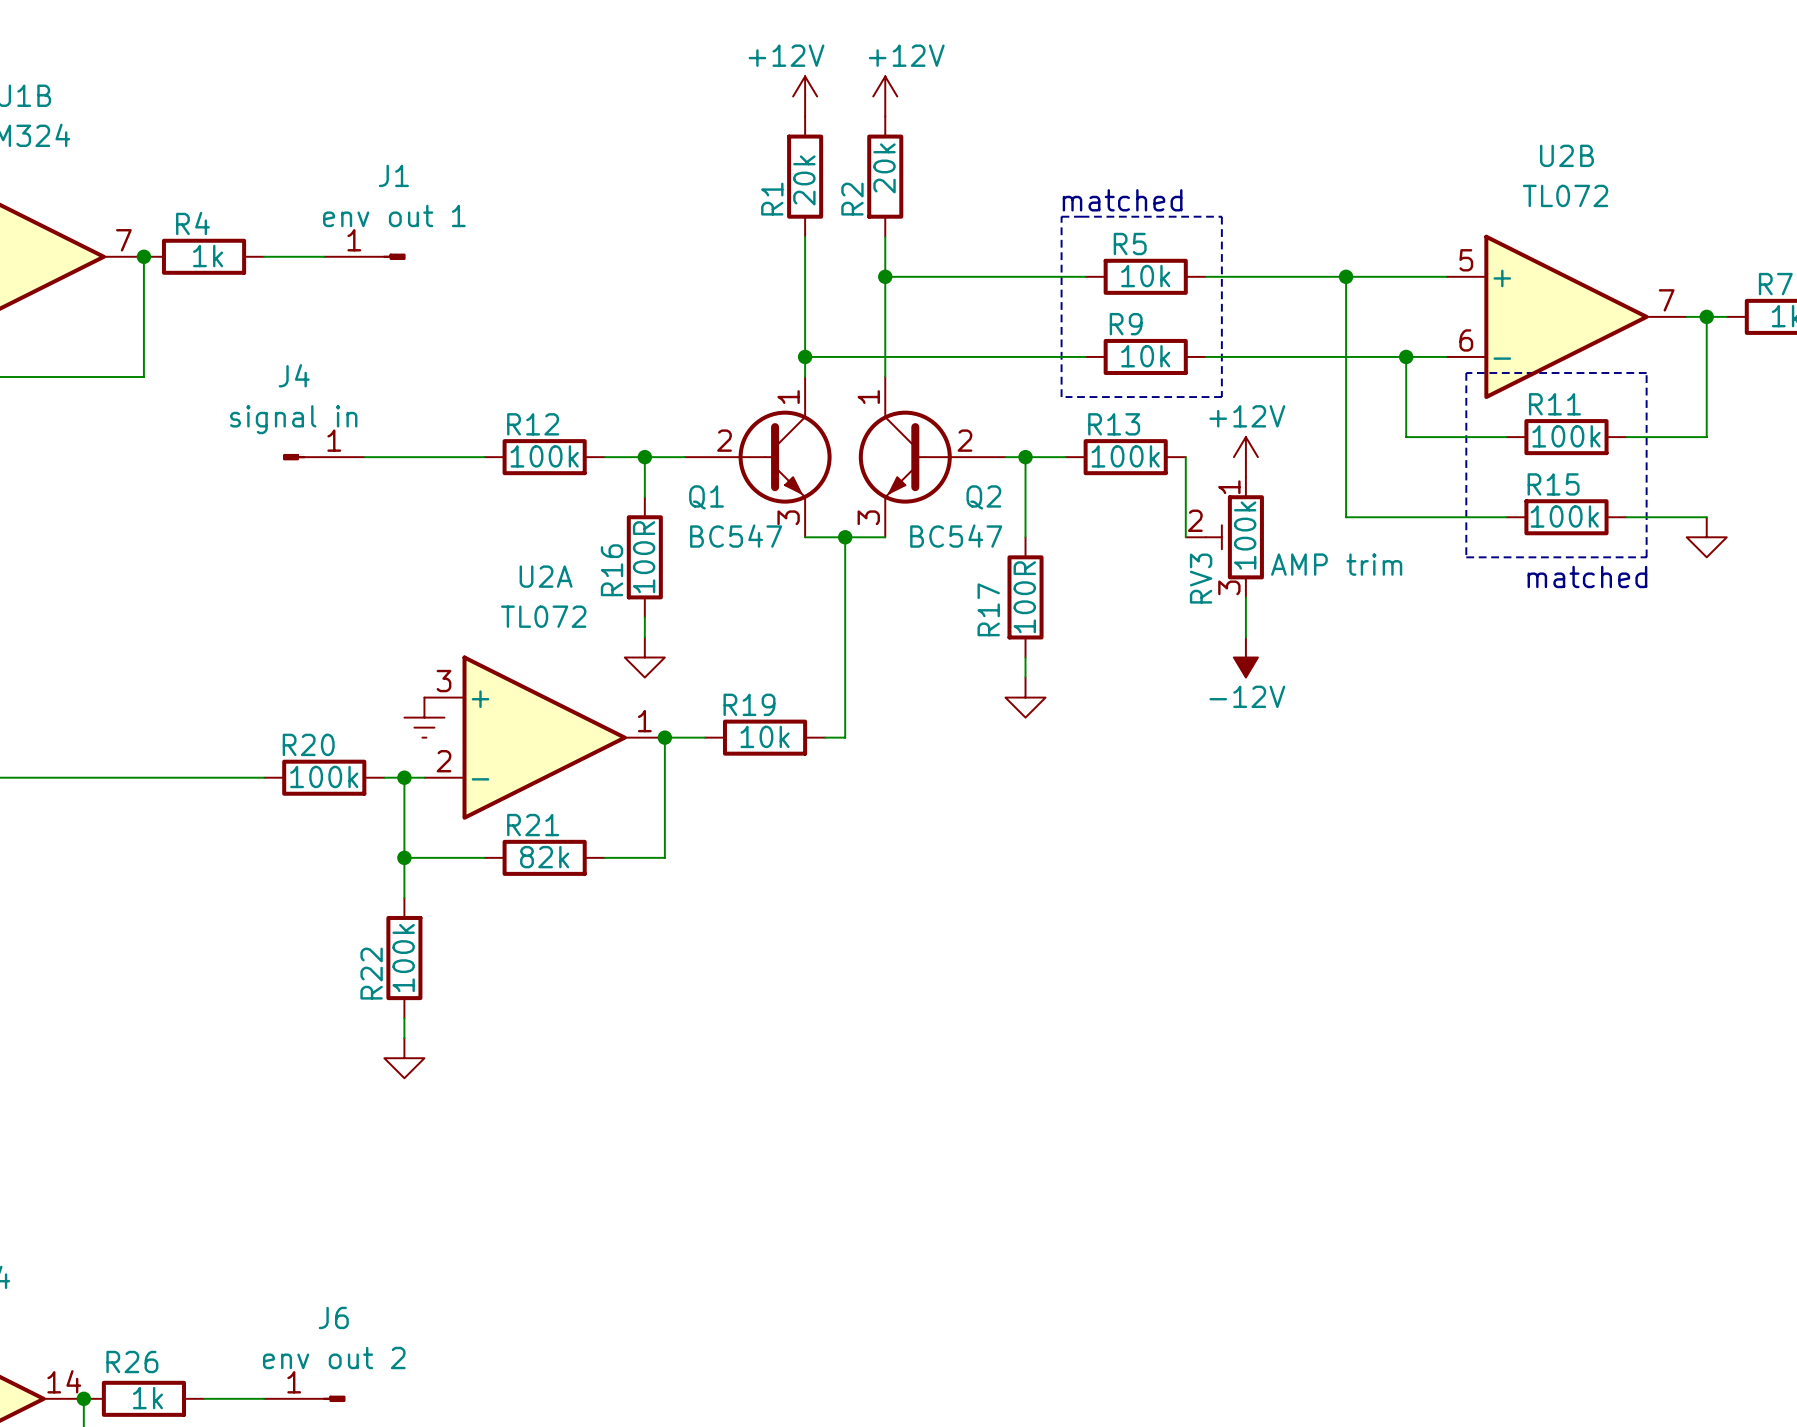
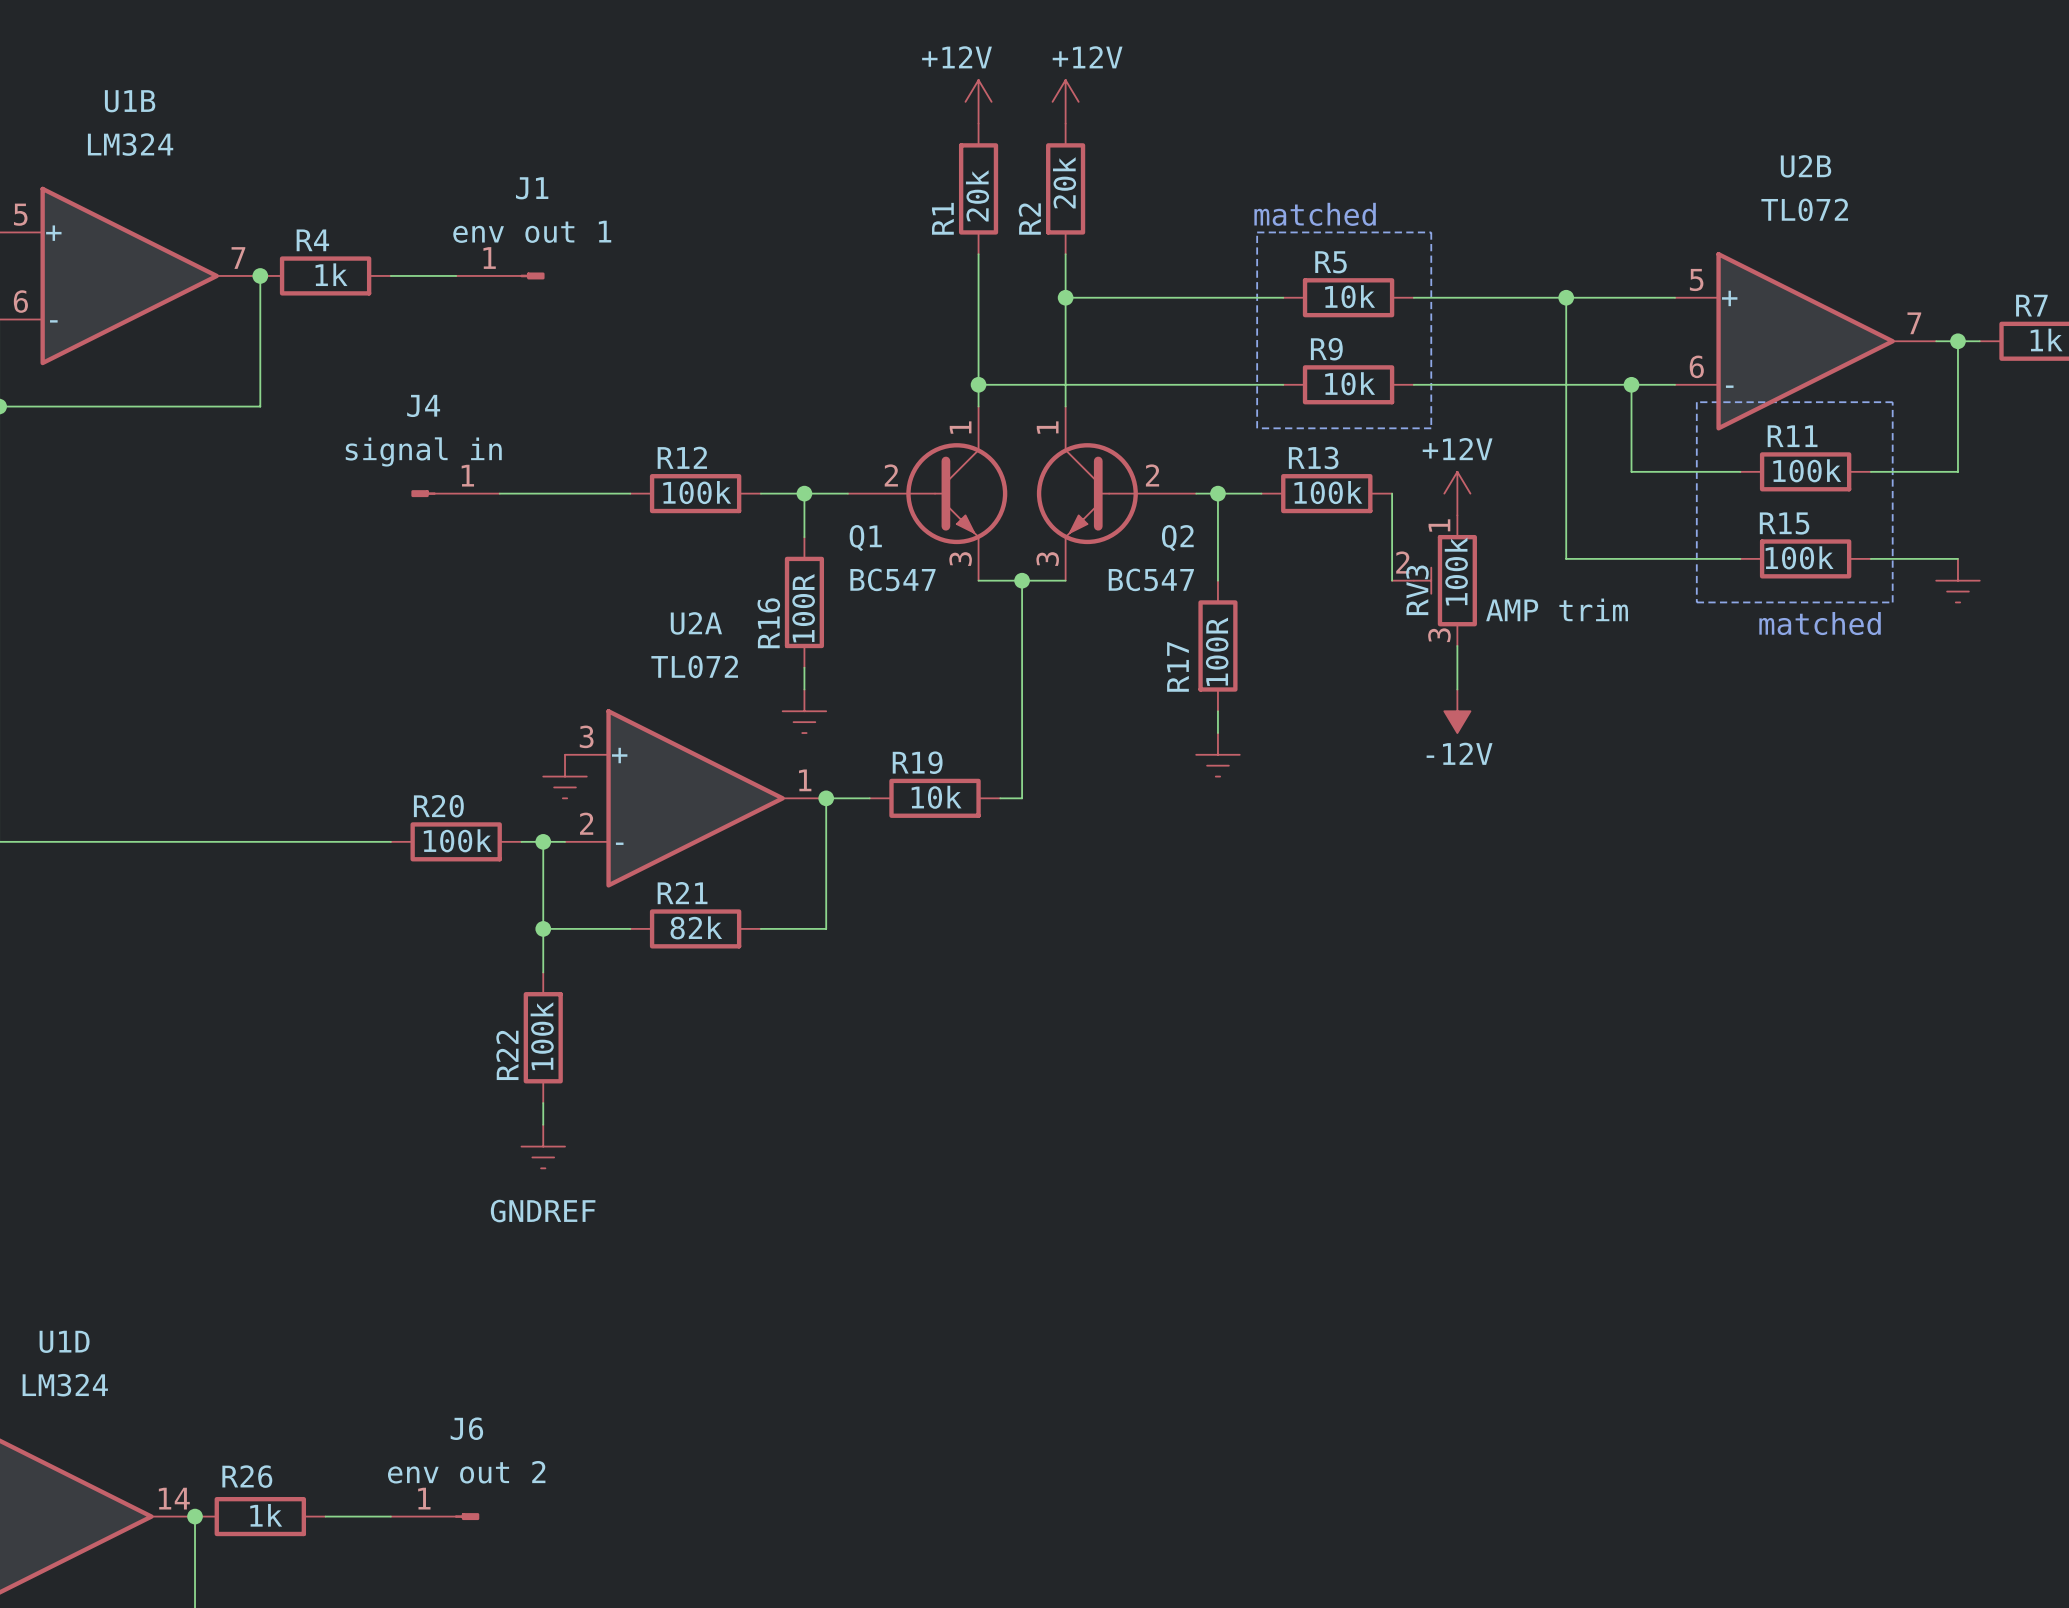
power symbol shape: [1686, 517, 1727, 558] -> [1936, 558, 1980, 603]
RV3 name position: RV3 (1201, 578) -> RV3 (1417, 590)
power symbol shape: [624, 637, 665, 678] -> [782, 689, 827, 734]
power symbol shape: [1005, 677, 1046, 718] -> [1196, 733, 1240, 777]
power symbol shape: [384, 1038, 425, 1079] -> [521, 1124, 566, 1169]
power symbol text: none -> GNDREF (543, 1211)

